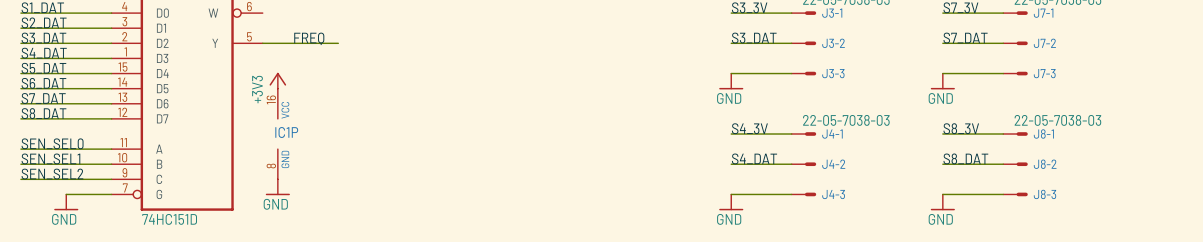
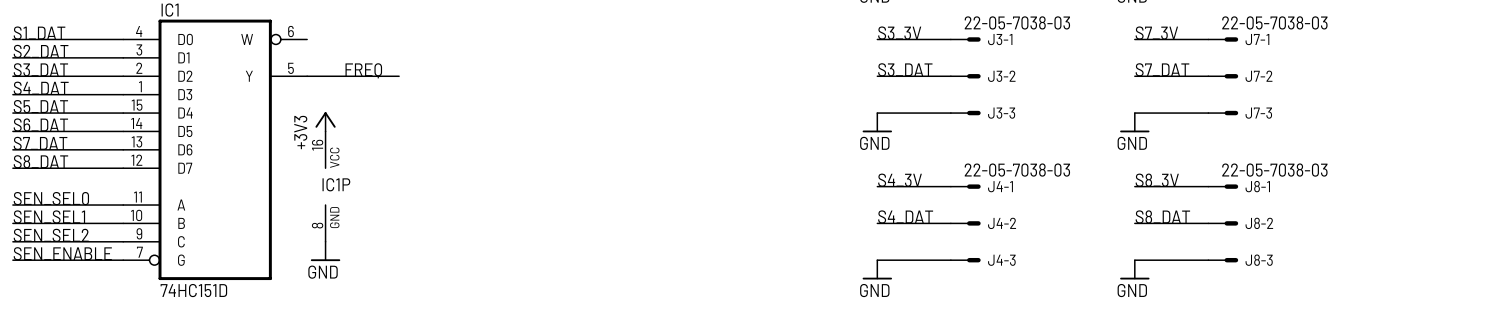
label: none -> SEN_ENABLE (62, 253)
wire: none -> (12, 260) (68, 260)
power symbol: GND (66, 202) -> none

